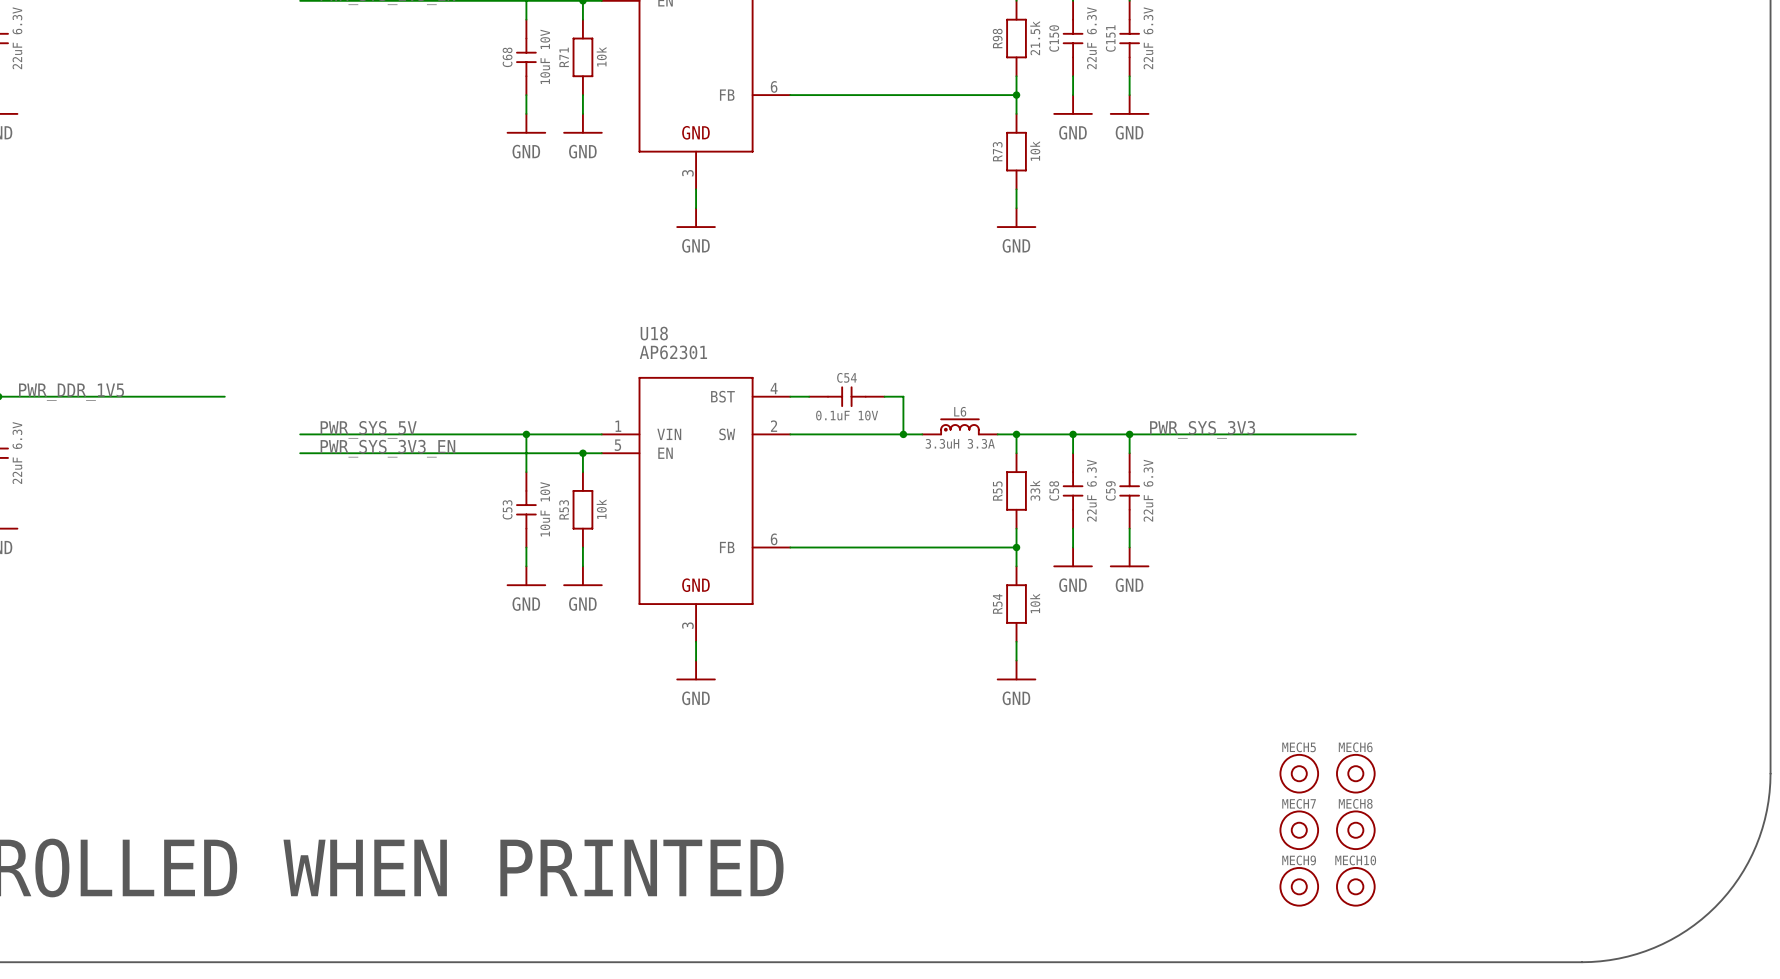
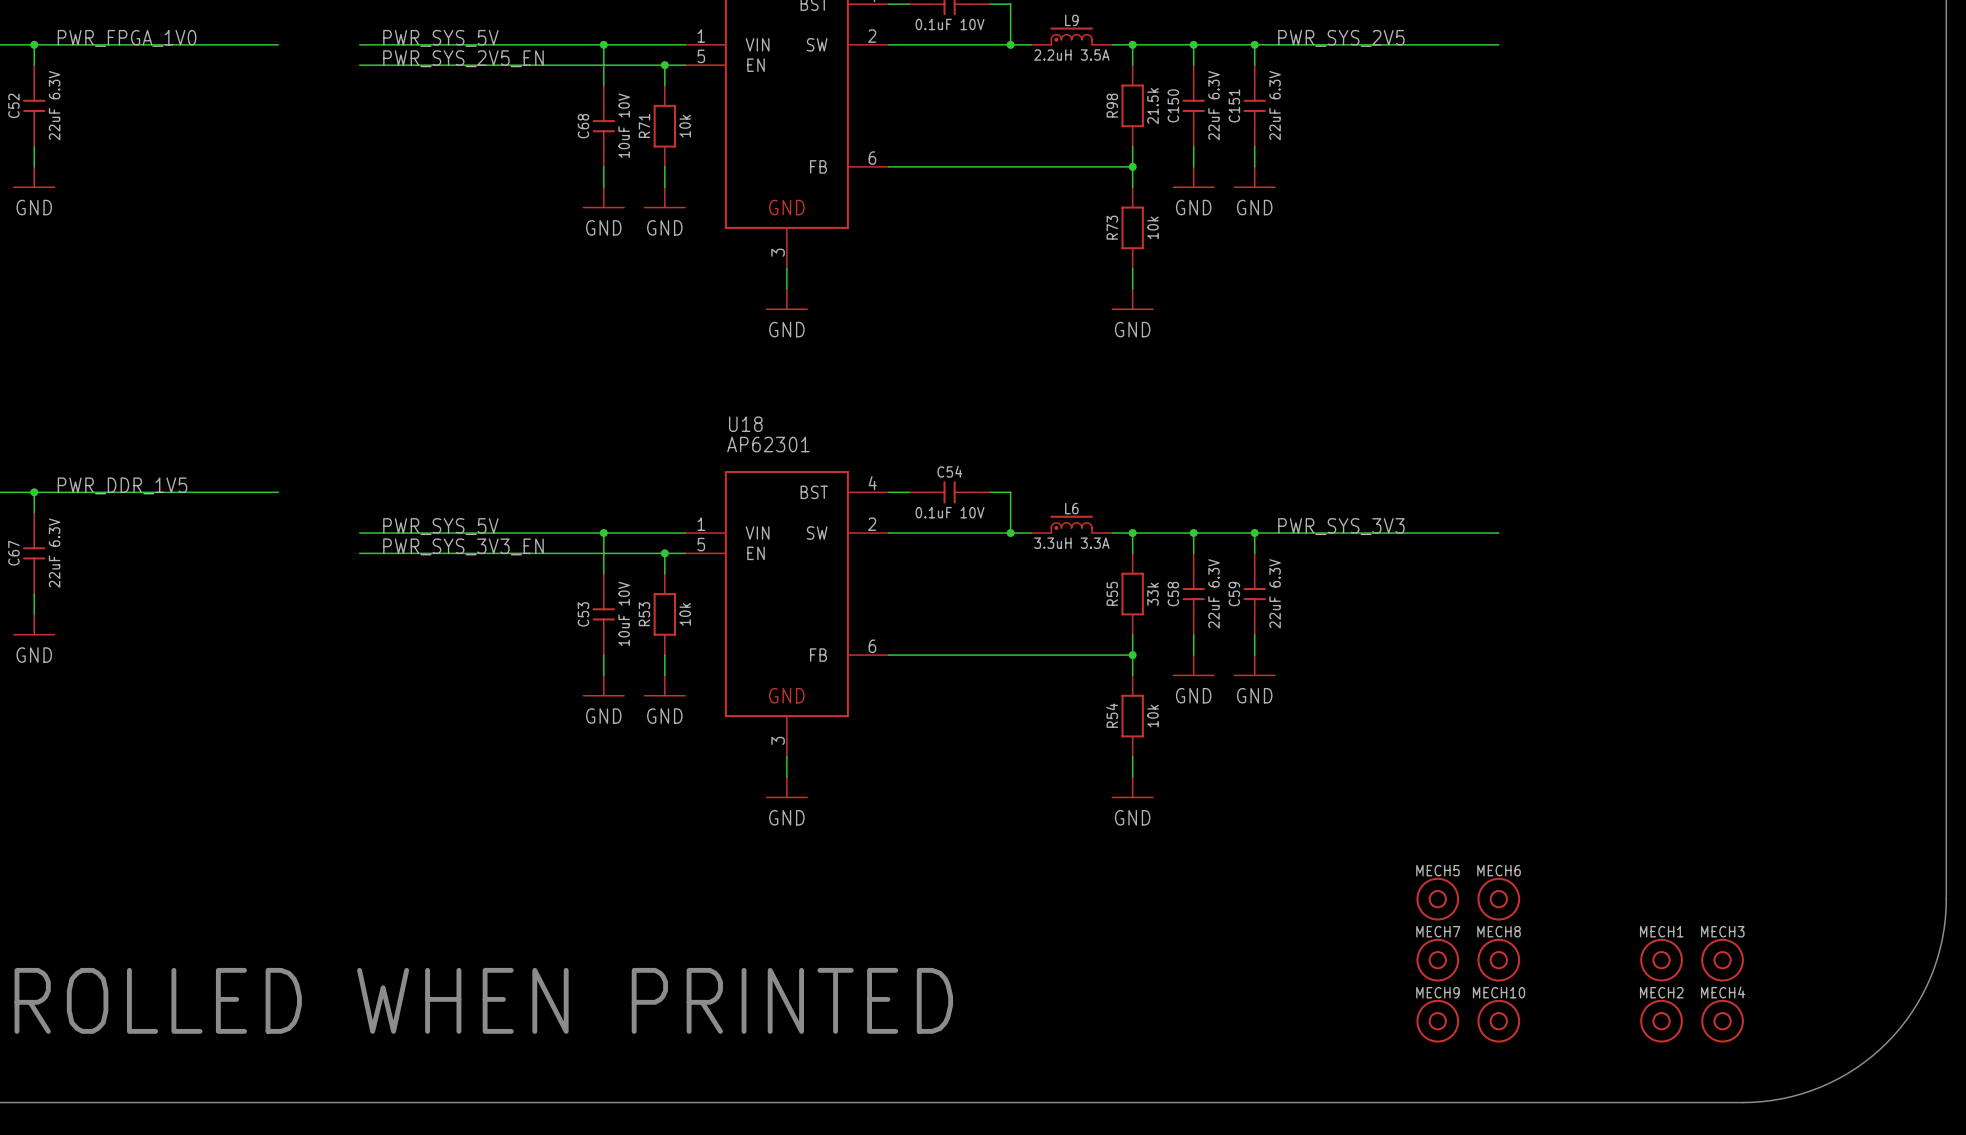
MECH1: none -> (1661, 960)
MECH3: none -> (1722, 960)
MECH2: none -> (1661, 1021)
MECH4: none -> (1722, 1021)

